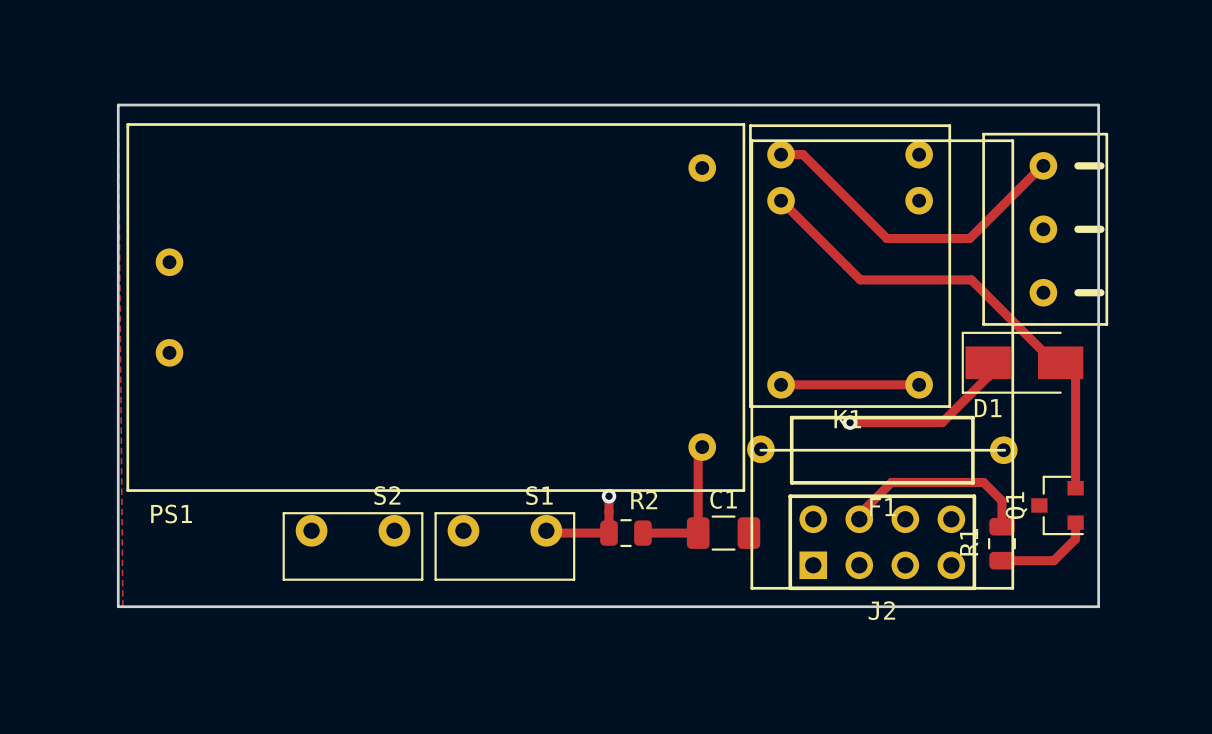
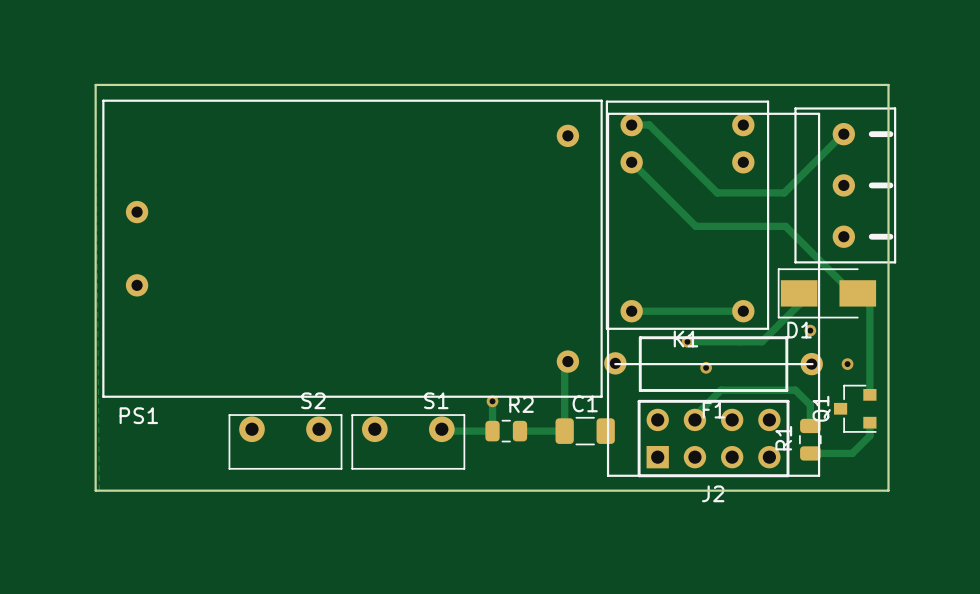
via: none -> (810, 330)
via: none -> (847, 364)
via: none -> (706, 367)

